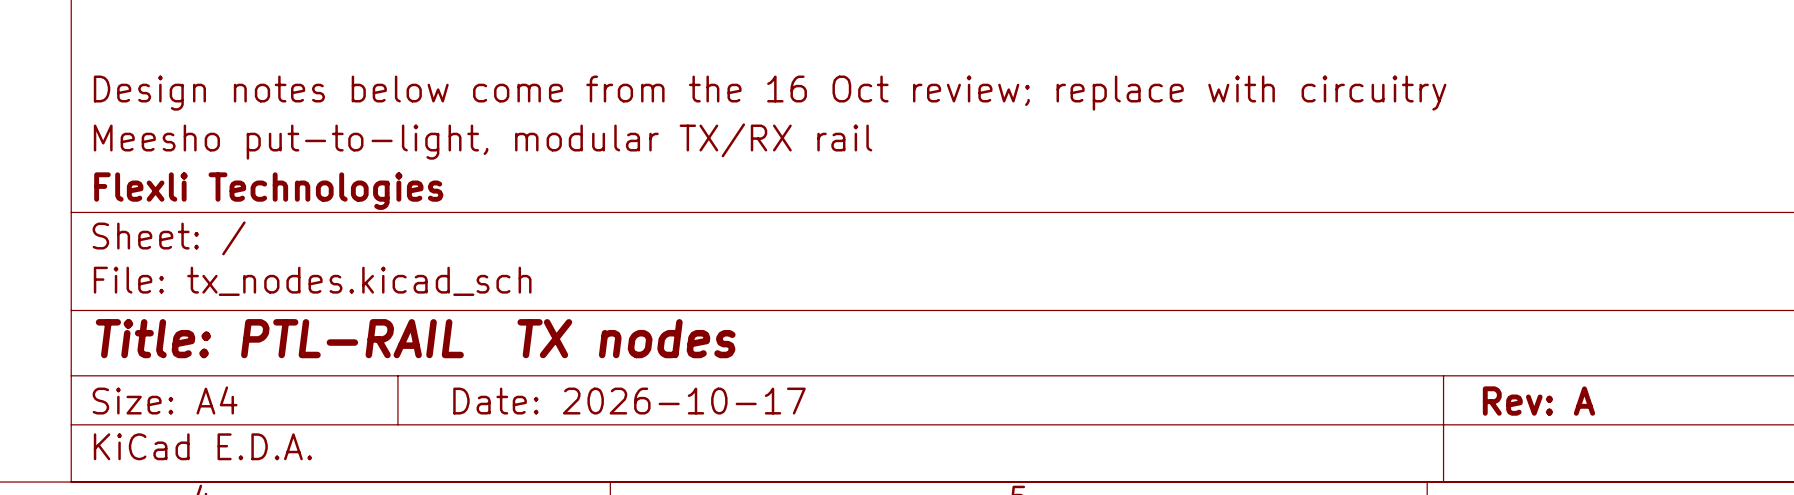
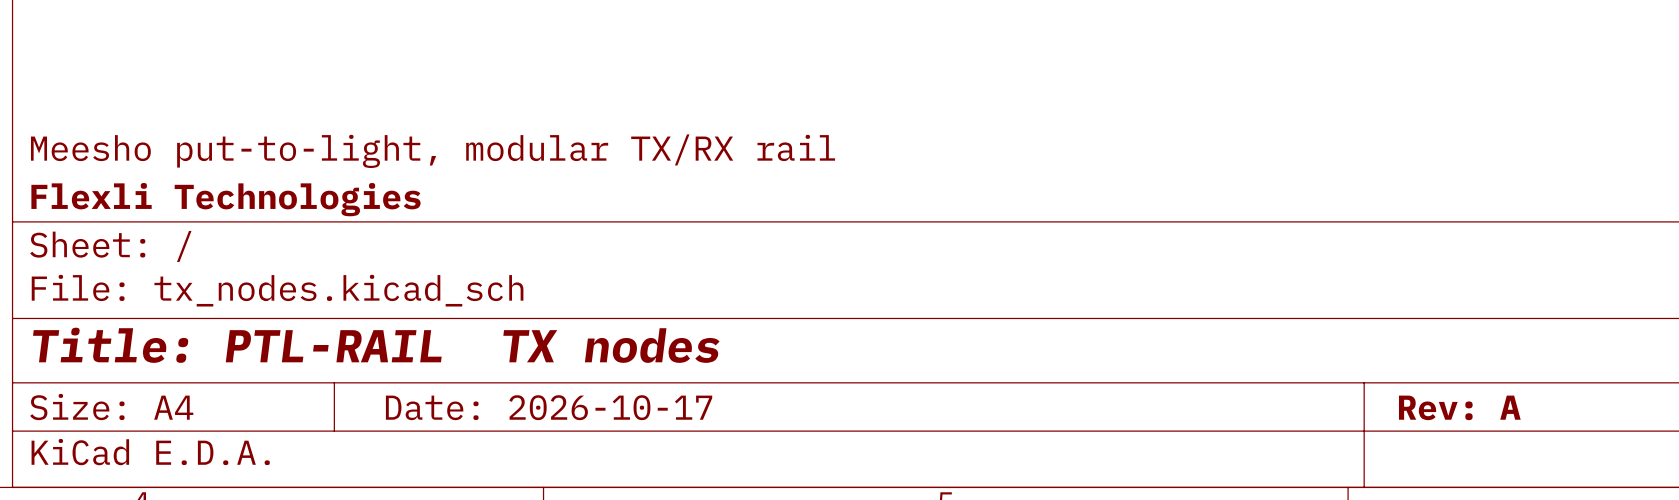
title block: Design notes below come from the 16 Oct review; replace with circuitry (770, 93) -> none

